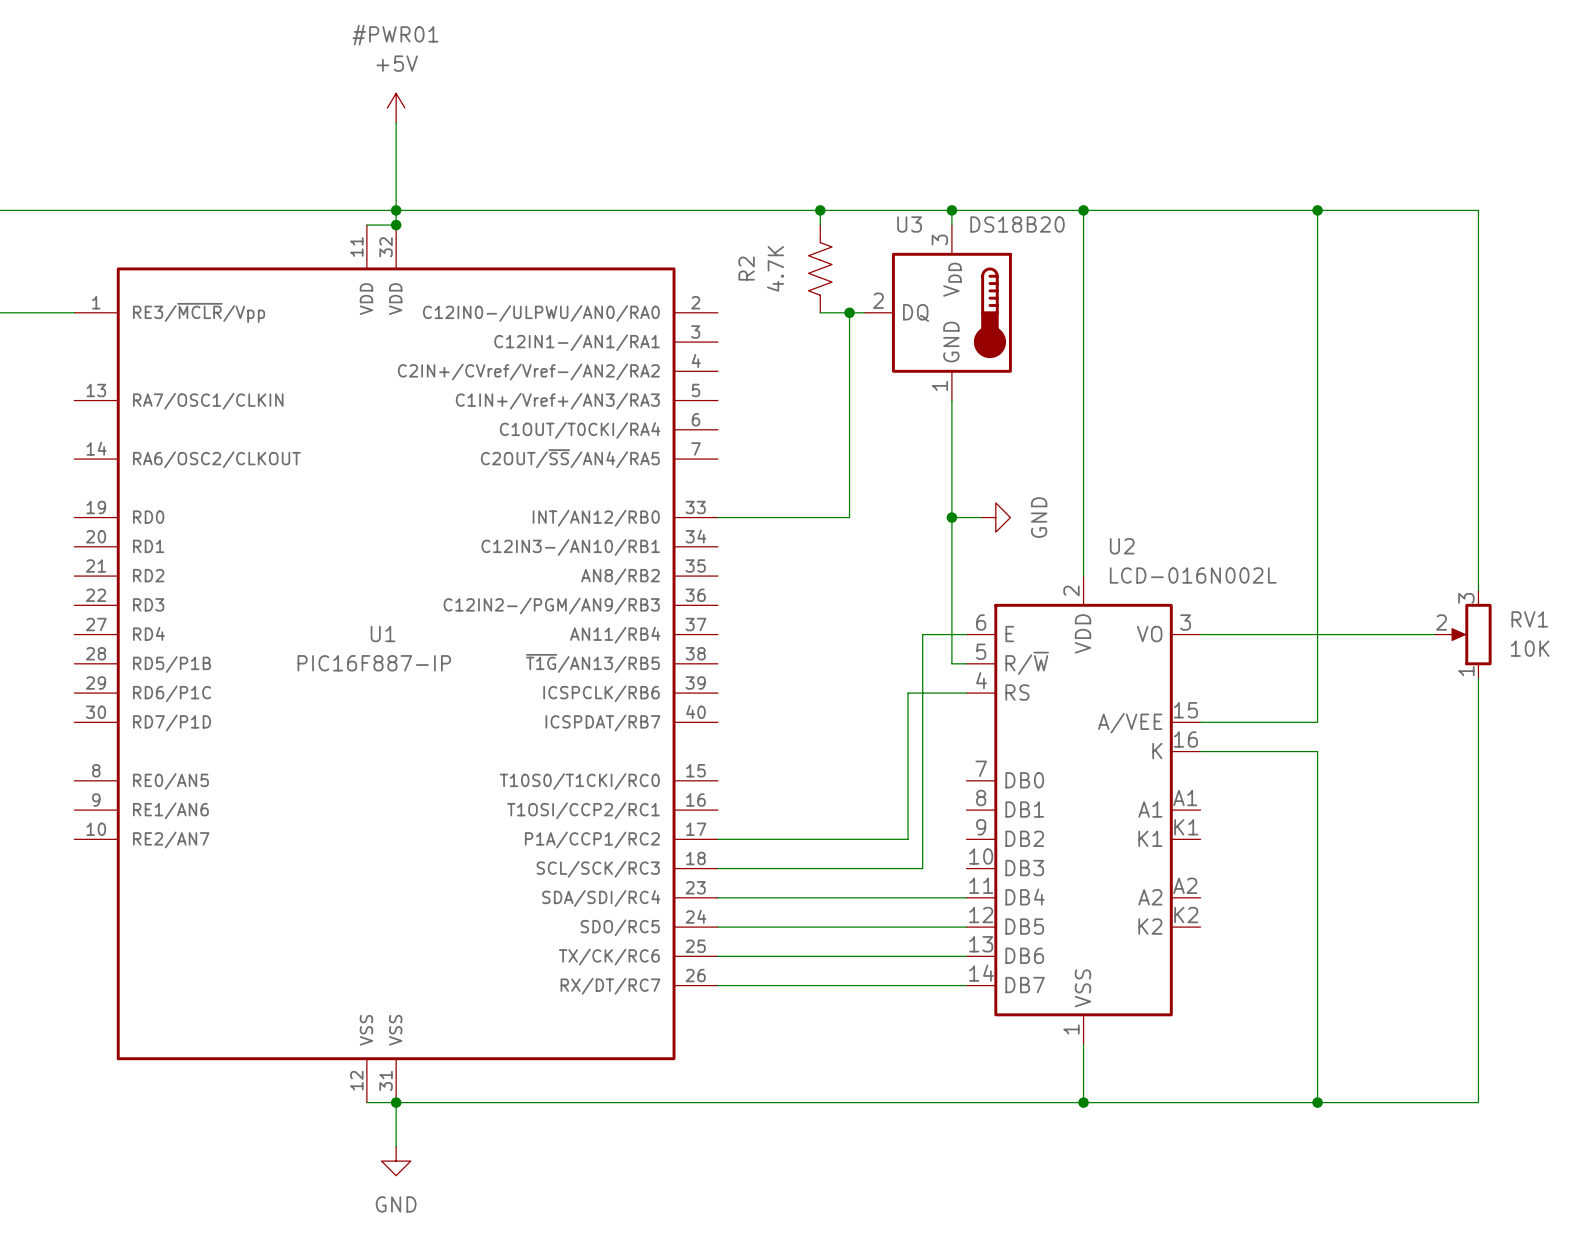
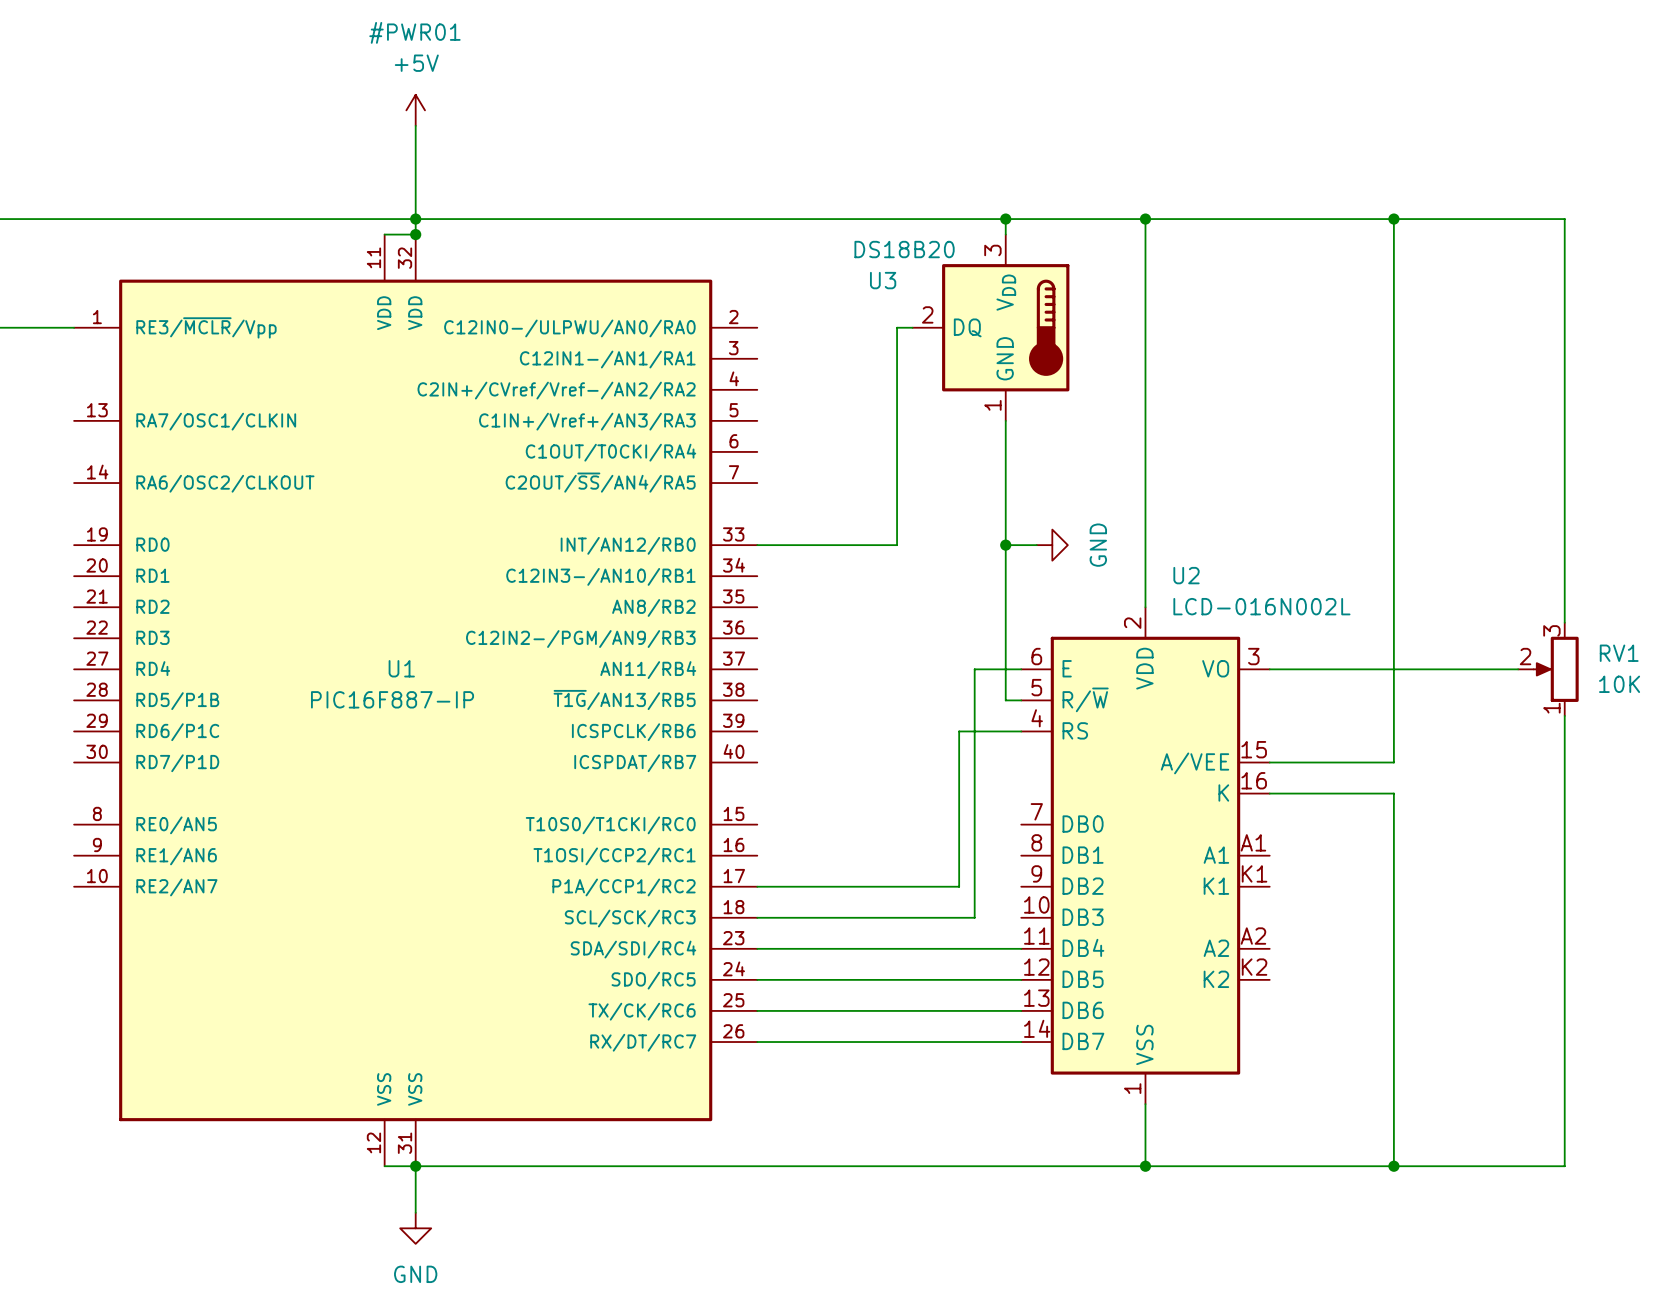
wire: (820, 210) (820, 225) -> none
junction: (820, 210) -> none
U3 name position: U3 (909, 224) -> U3 (883, 280)
U3 value position: DS18B20 (1017, 224) -> DS18B20 (904, 249)
R2: 4.7K (820, 268) -> none
wire: (820, 312) (849, 312) -> none
junction: (849, 312) -> none

